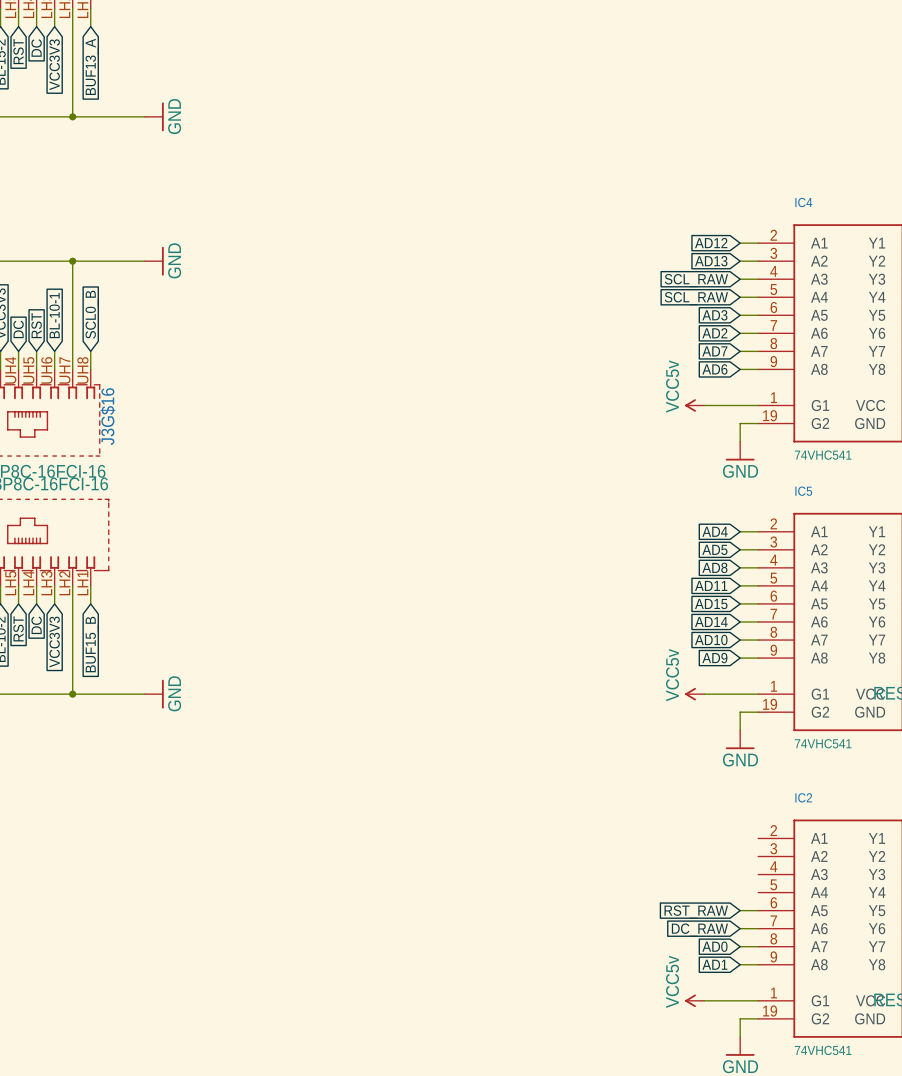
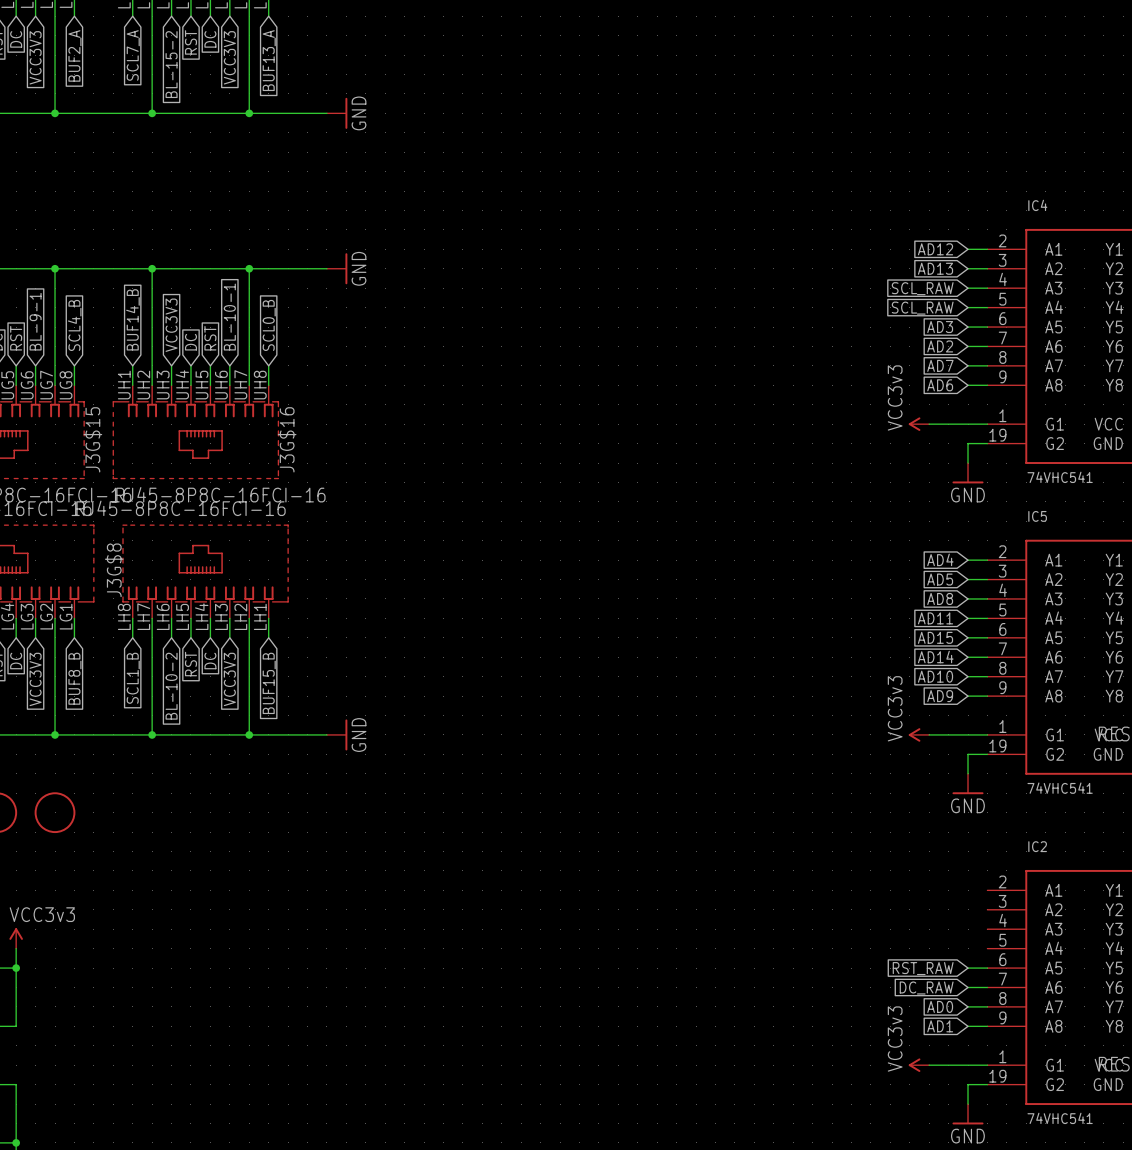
power symbol: VCC5v (694, 405) -> VCC3v3 (918, 424)
power symbol: VCC5v (694, 694) -> VCC3v3 (918, 734)
power symbol: VCC5v (694, 1000) -> VCC3v3 (918, 1065)

